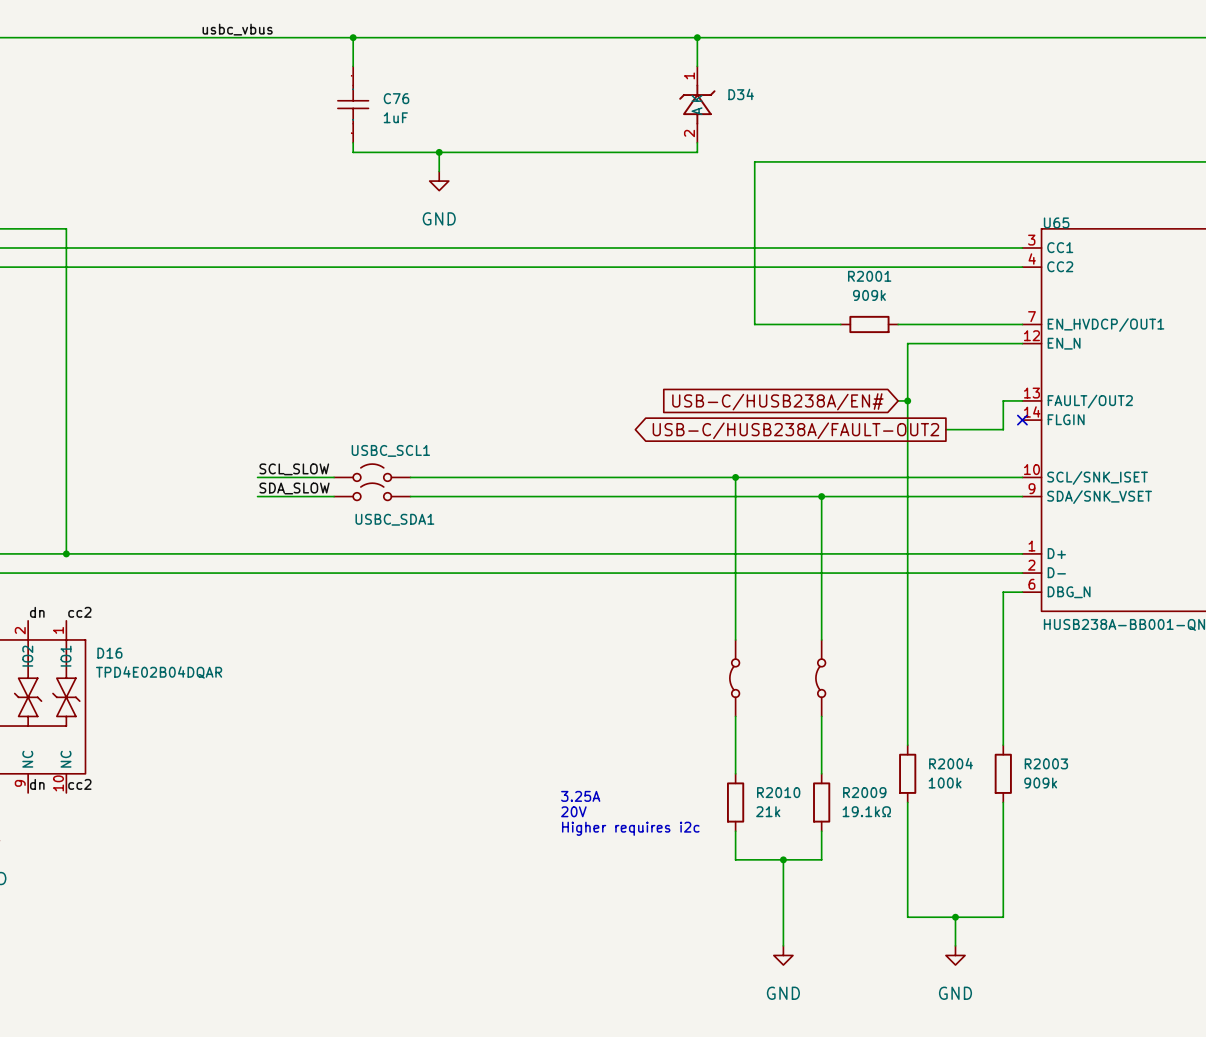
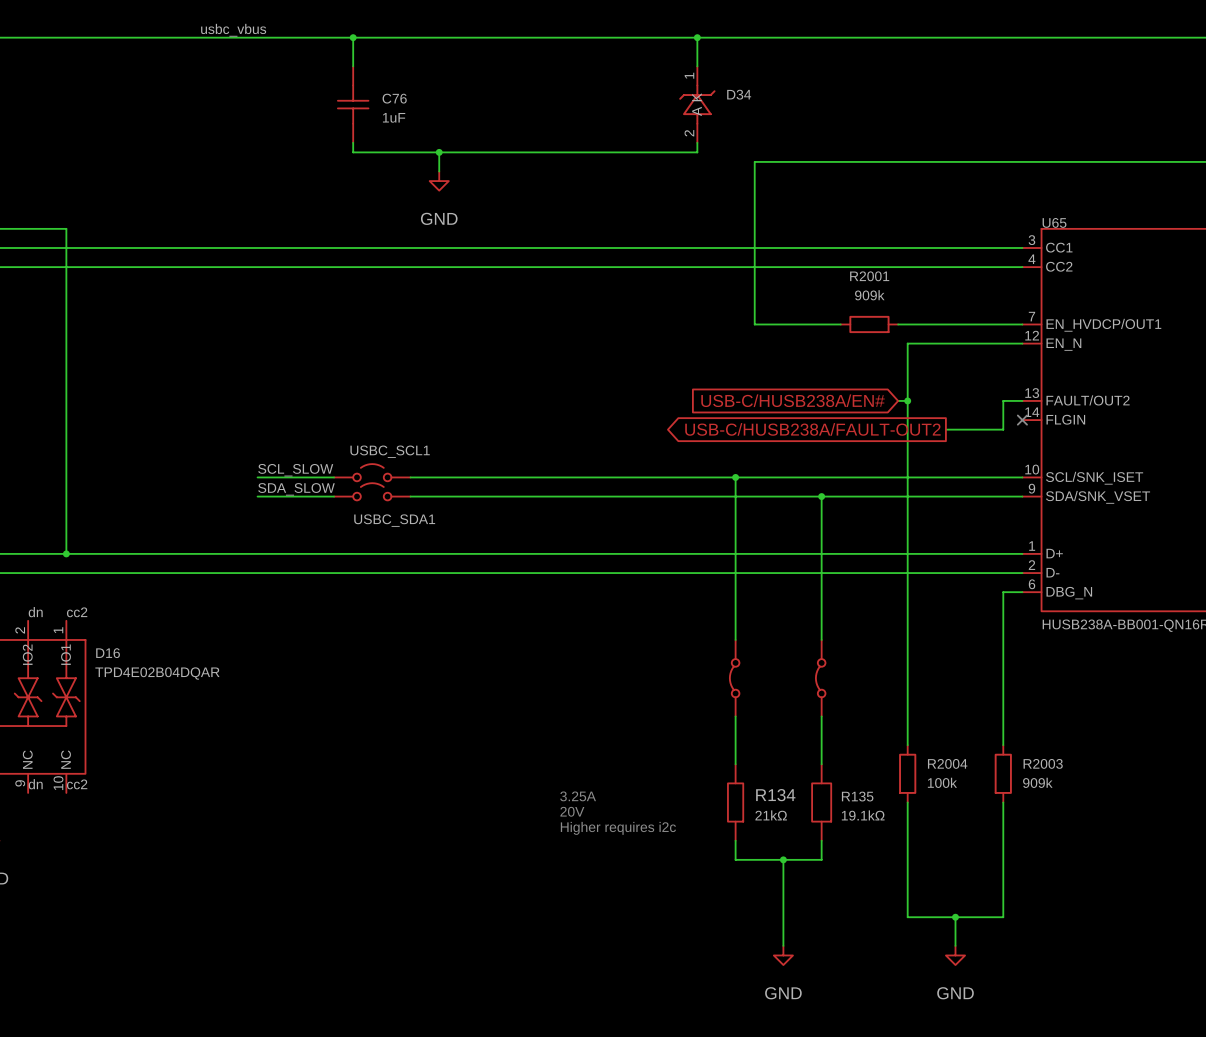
R2010: 21k (735, 802) -> none
R134: none -> 21kΩ (735, 802)
R2009: 19.1kΩ (821, 802) -> none
R135: none -> 19.1kΩ (821, 802)

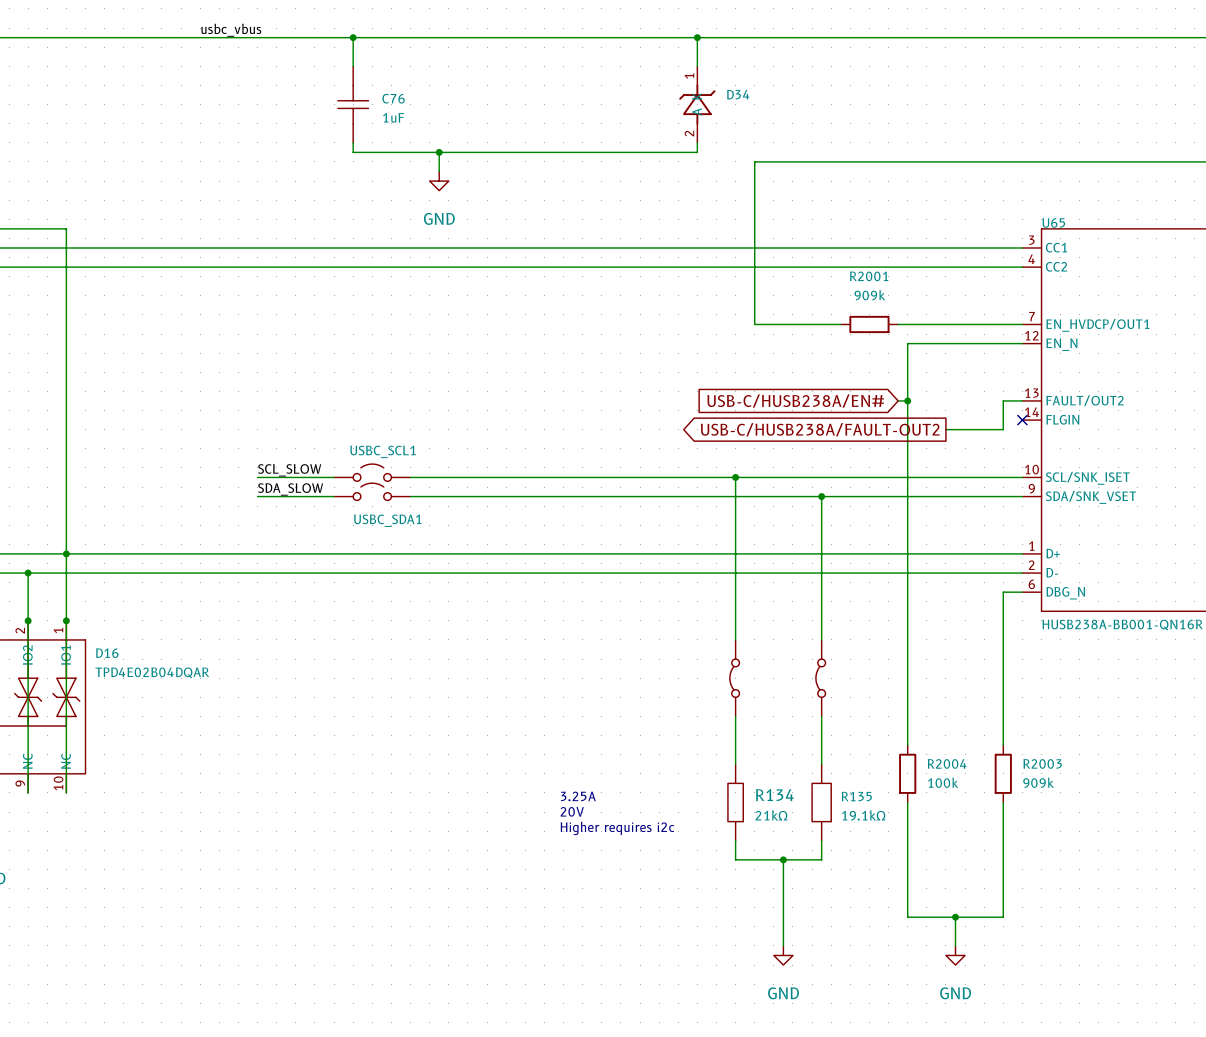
wire: none -> (66, 553) (66, 792)
wire: none -> (28, 573) (28, 792)
junction: none -> (28, 573)
label: dn (35, 612) -> none
label: cc2 (77, 612) -> none
junction: none -> (28, 620)
junction: none -> (66, 620)
label: dn (35, 784) -> none
label: cc2 (77, 784) -> none

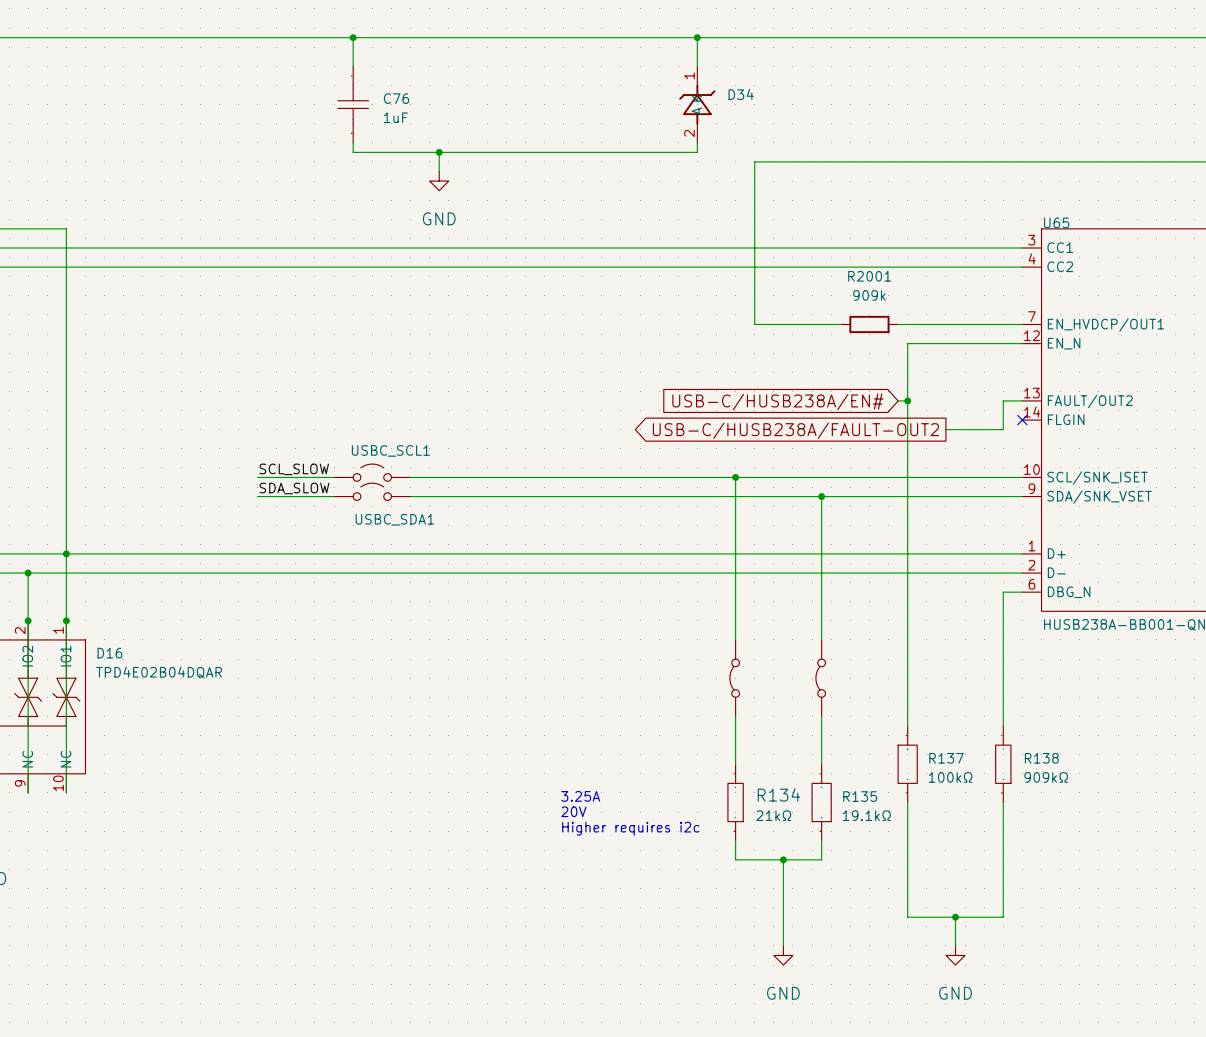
label: usbc_vbus (231, 30) -> none
R137: none -> 100kΩ (907, 764)
R138: none -> 909kΩ (1003, 764)
R2004: 100k (907, 773) -> none
R2003: 909k (1003, 773) -> none

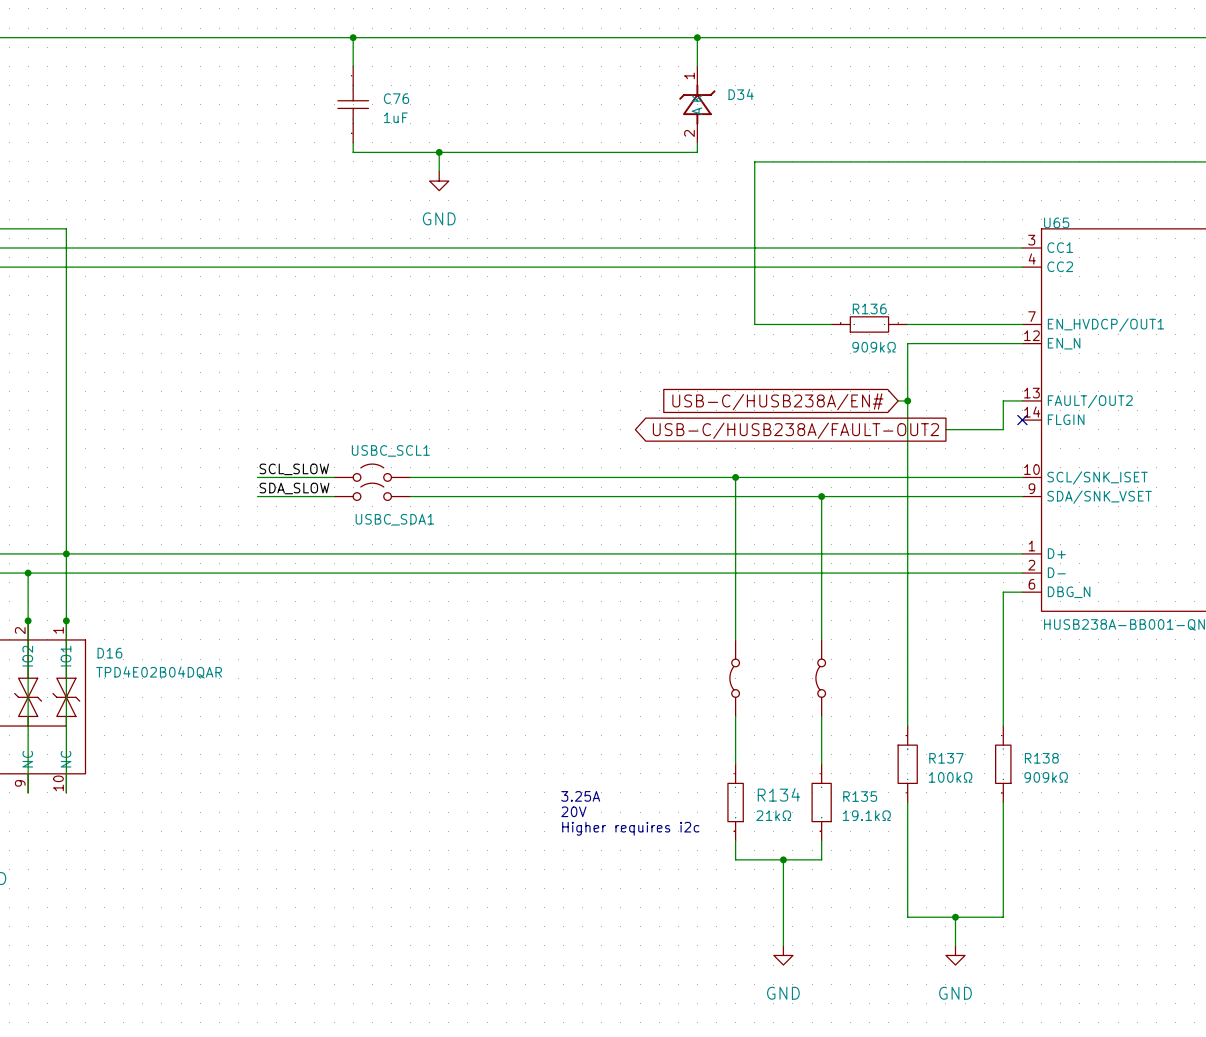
R2001: 909k (869, 324) -> none
R136: none -> 909kΩ (869, 324)

